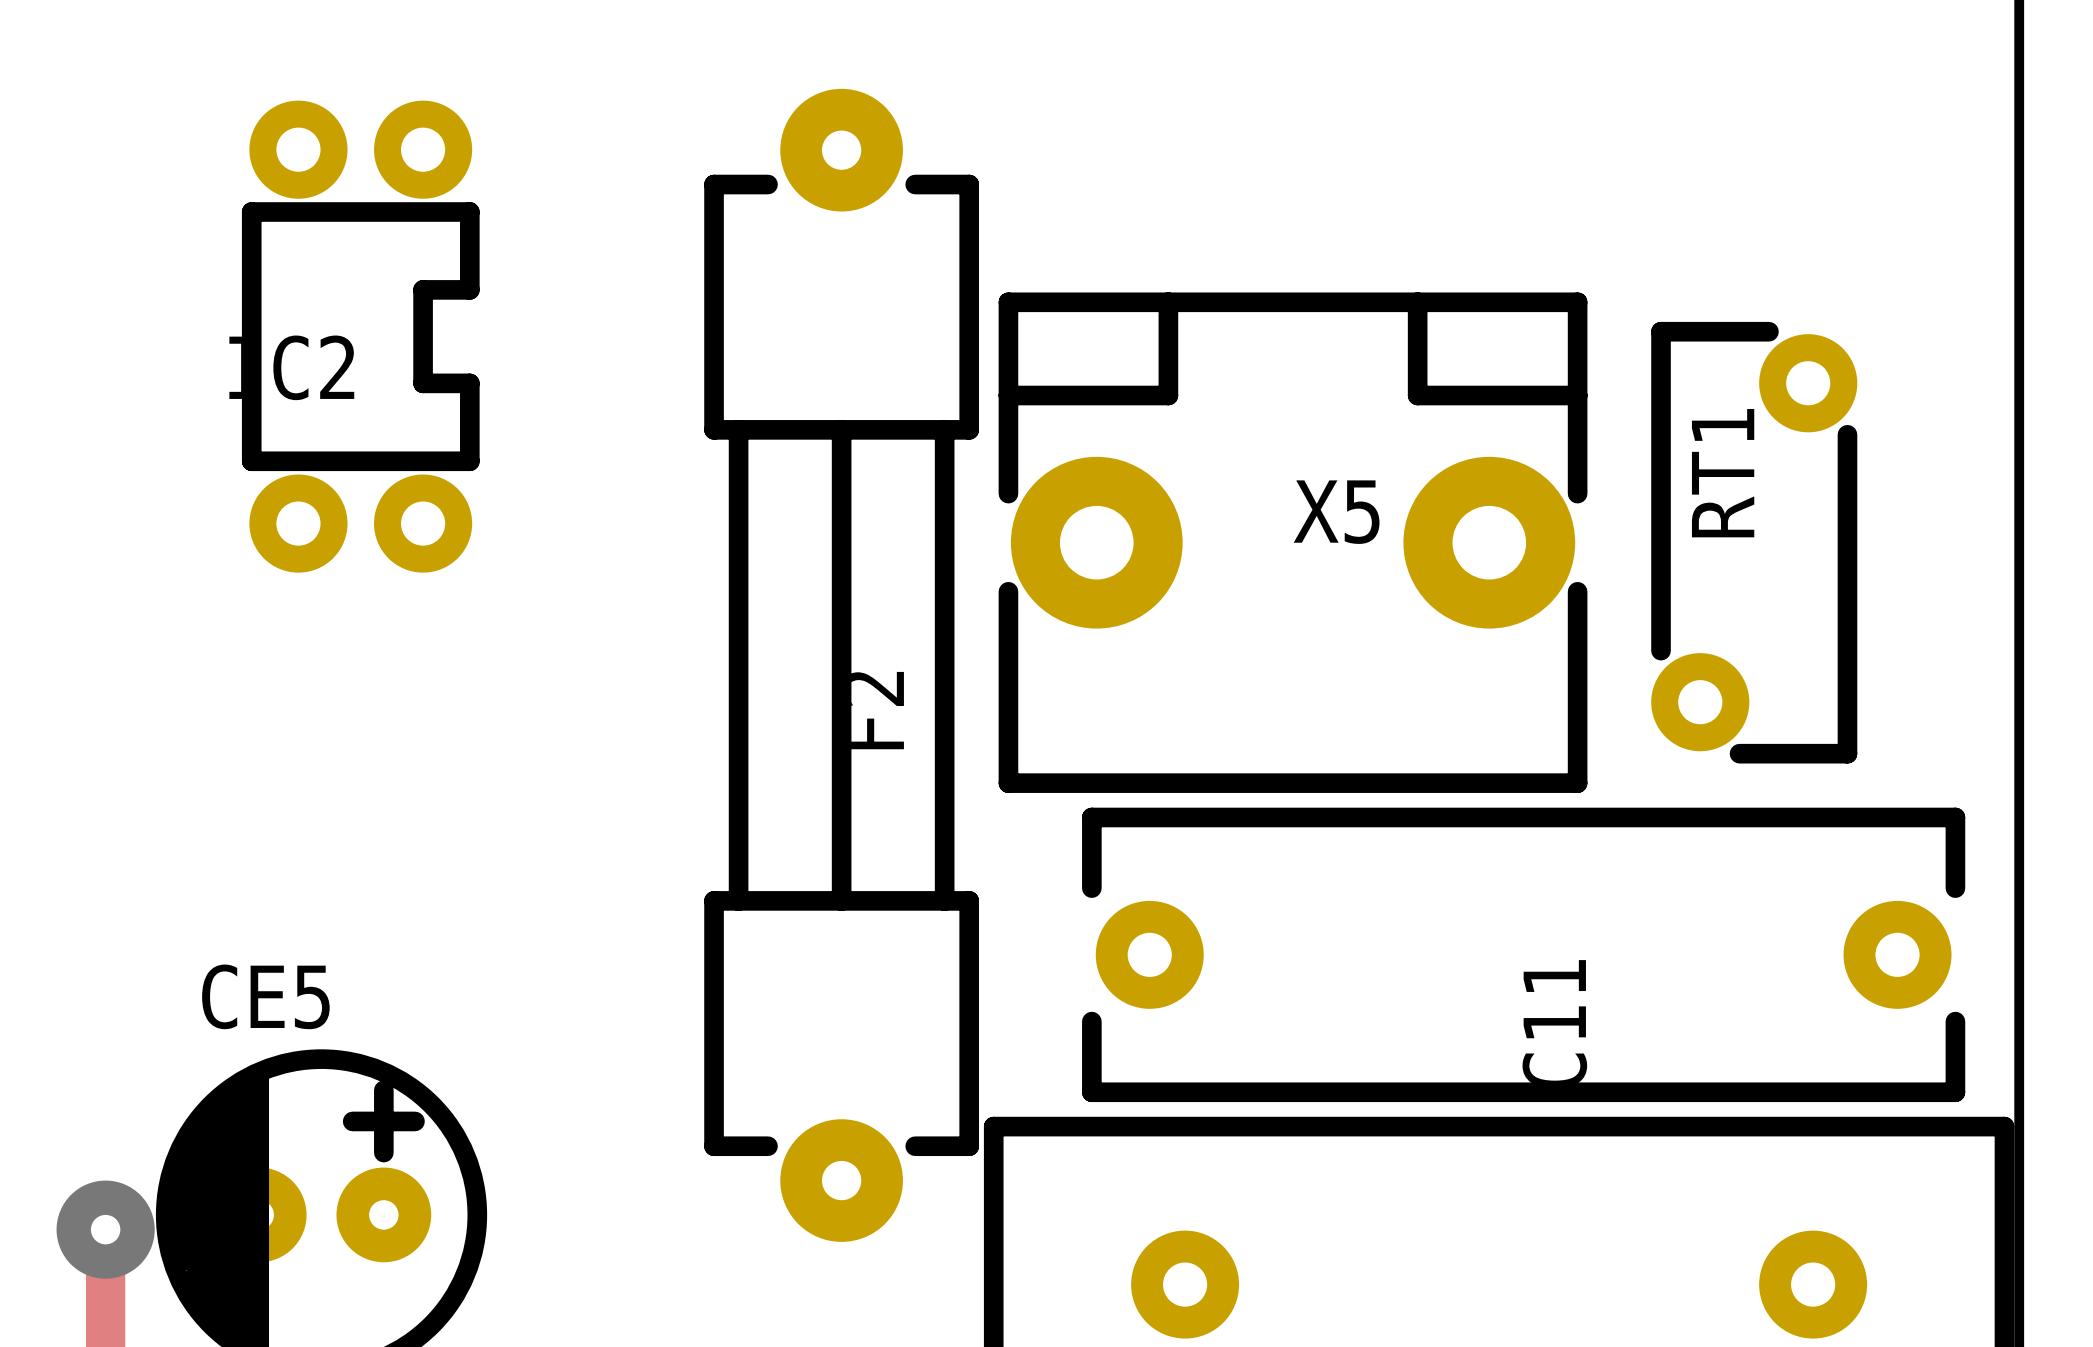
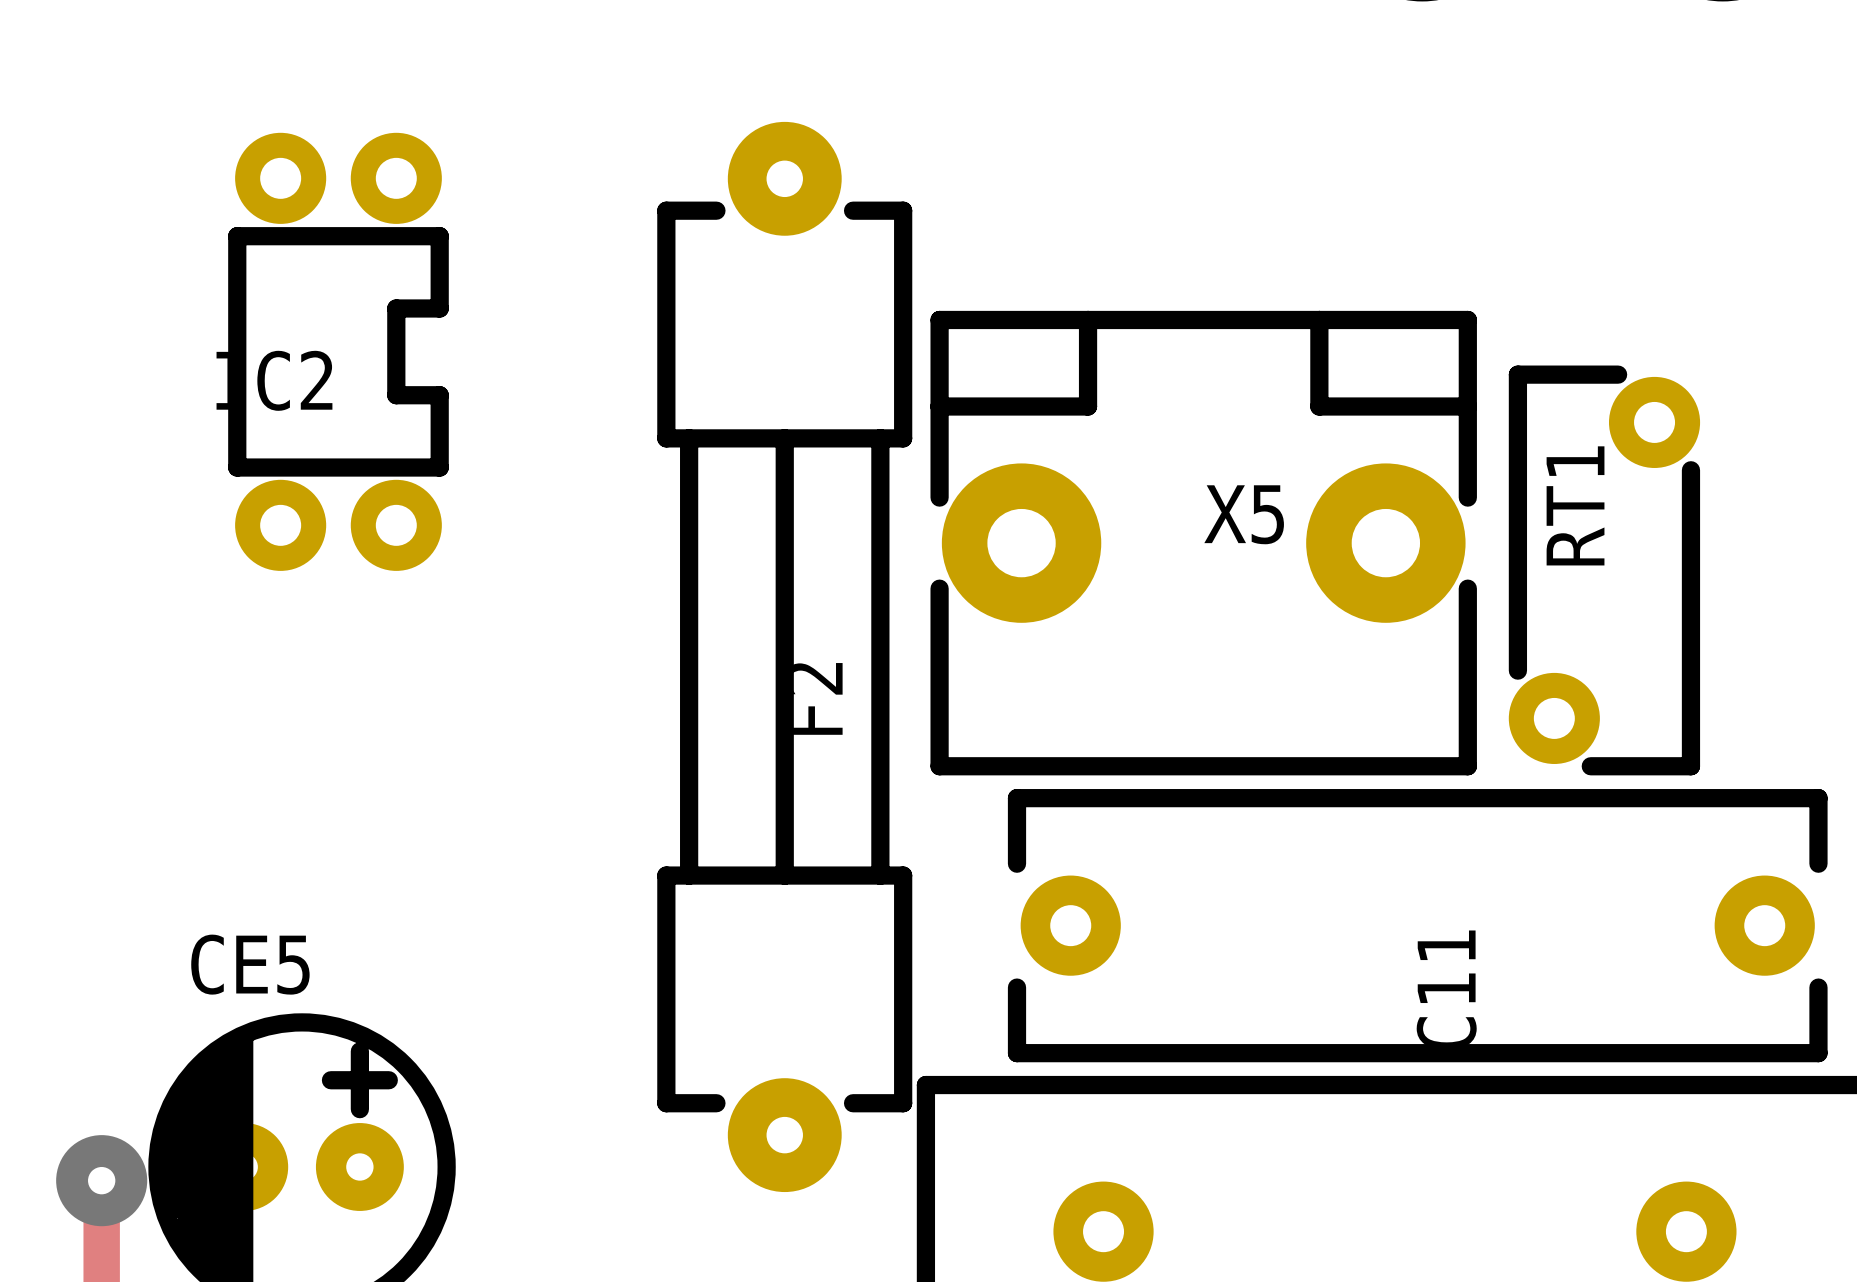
RT1 position: (1754, 542) -> (1604, 570)

